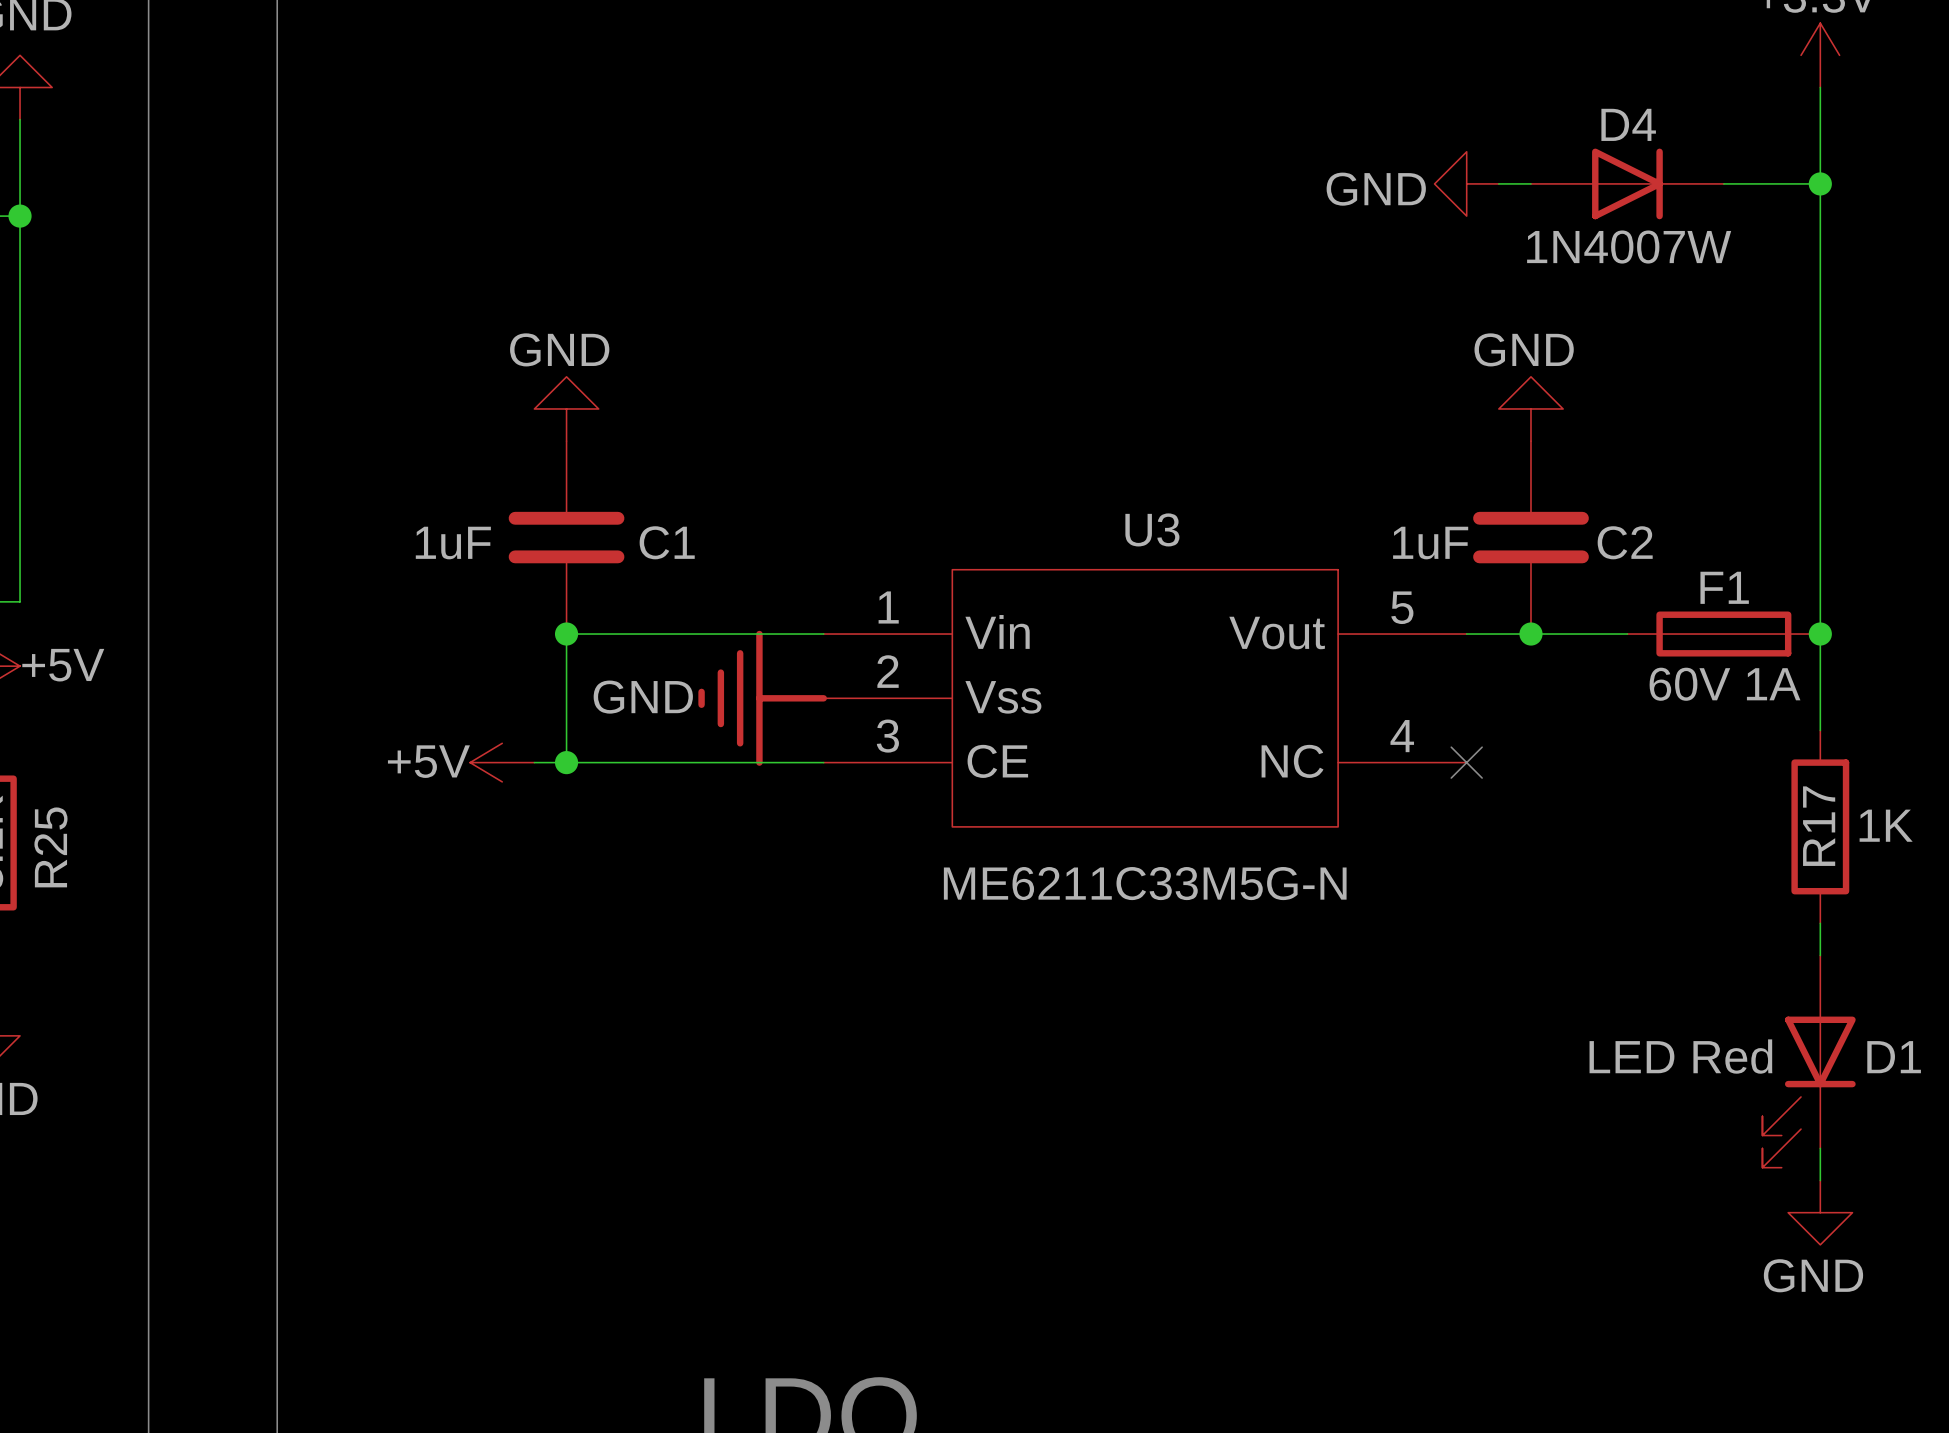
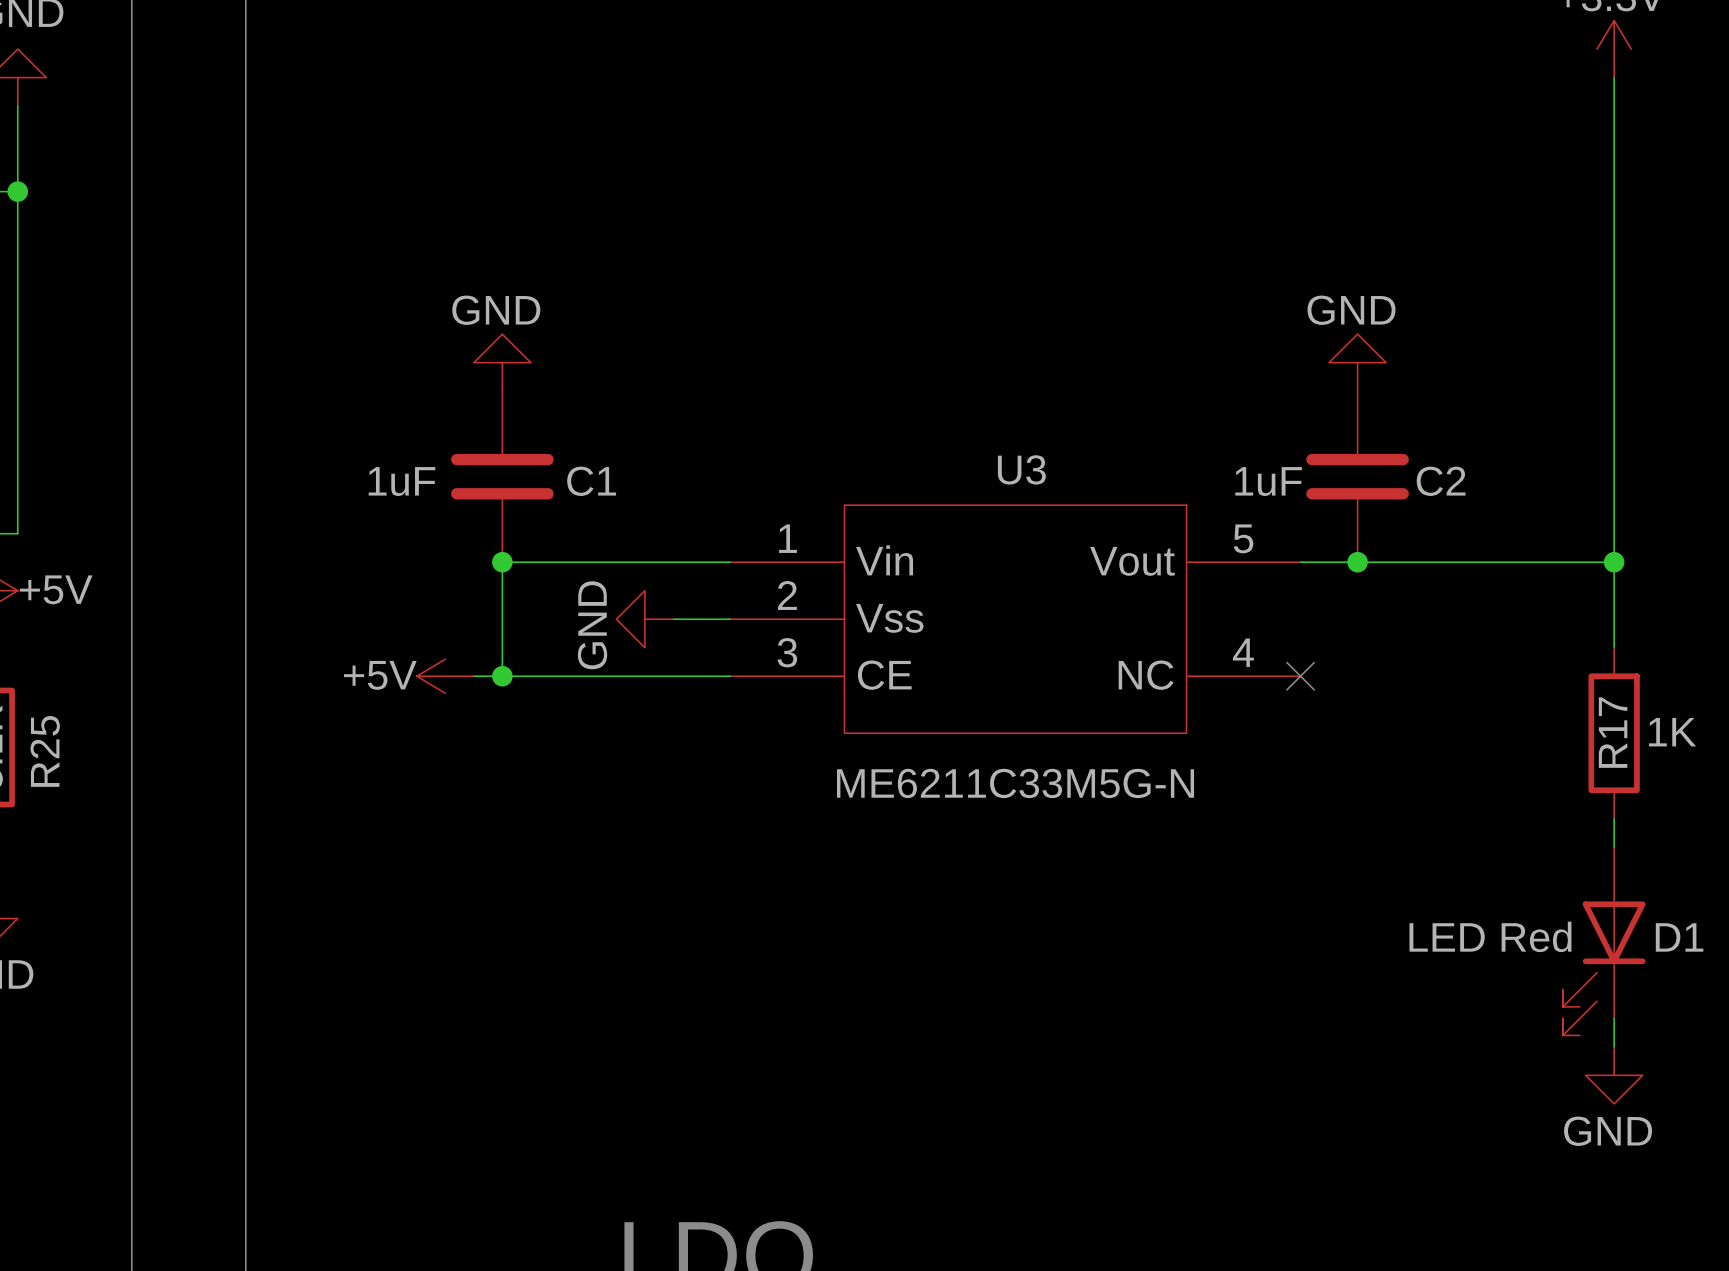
power symbol: GND (1466, 183) -> none
wire: (1498, 183) (1530, 183) -> none
D4: 1N4007W (1627, 183) -> none
wire: (1723, 183) (1820, 183) -> none
junction: (1820, 183) -> none
F1: 60V 1A (1723, 634) -> none
power symbol: none -> GND (644, 619)
power symbol: GND (762, 698) -> none

